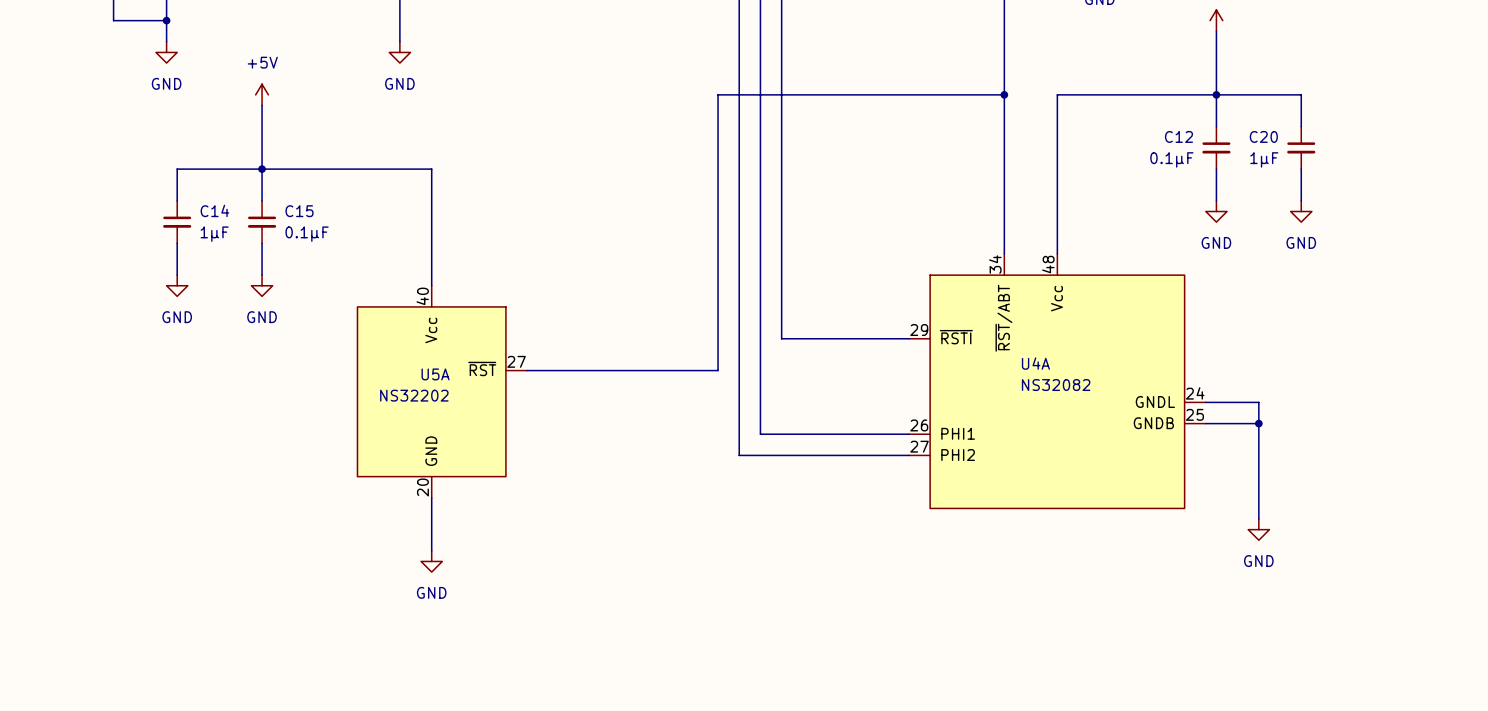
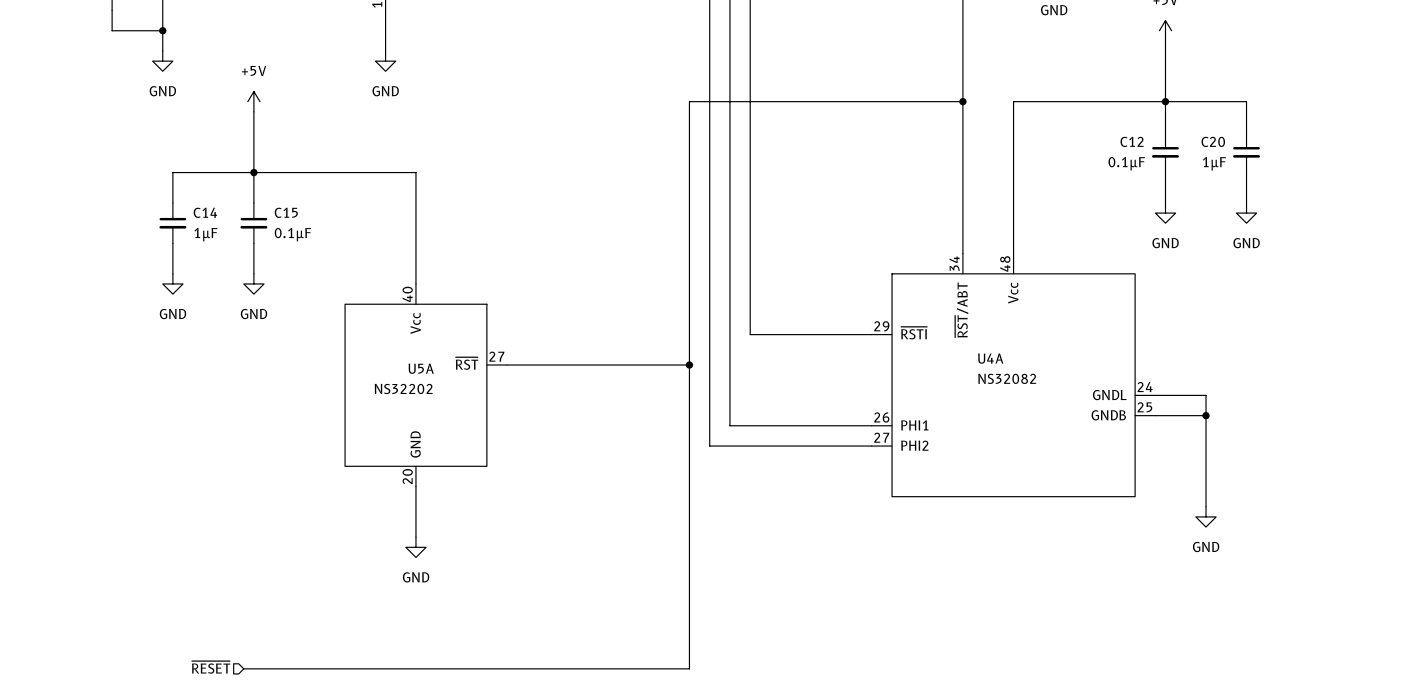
wire: none -> (689, 365) (689, 668) (243, 668)
junction: none -> (689, 365)
hierarchical label: none -> ~{RESET} (211, 667)

